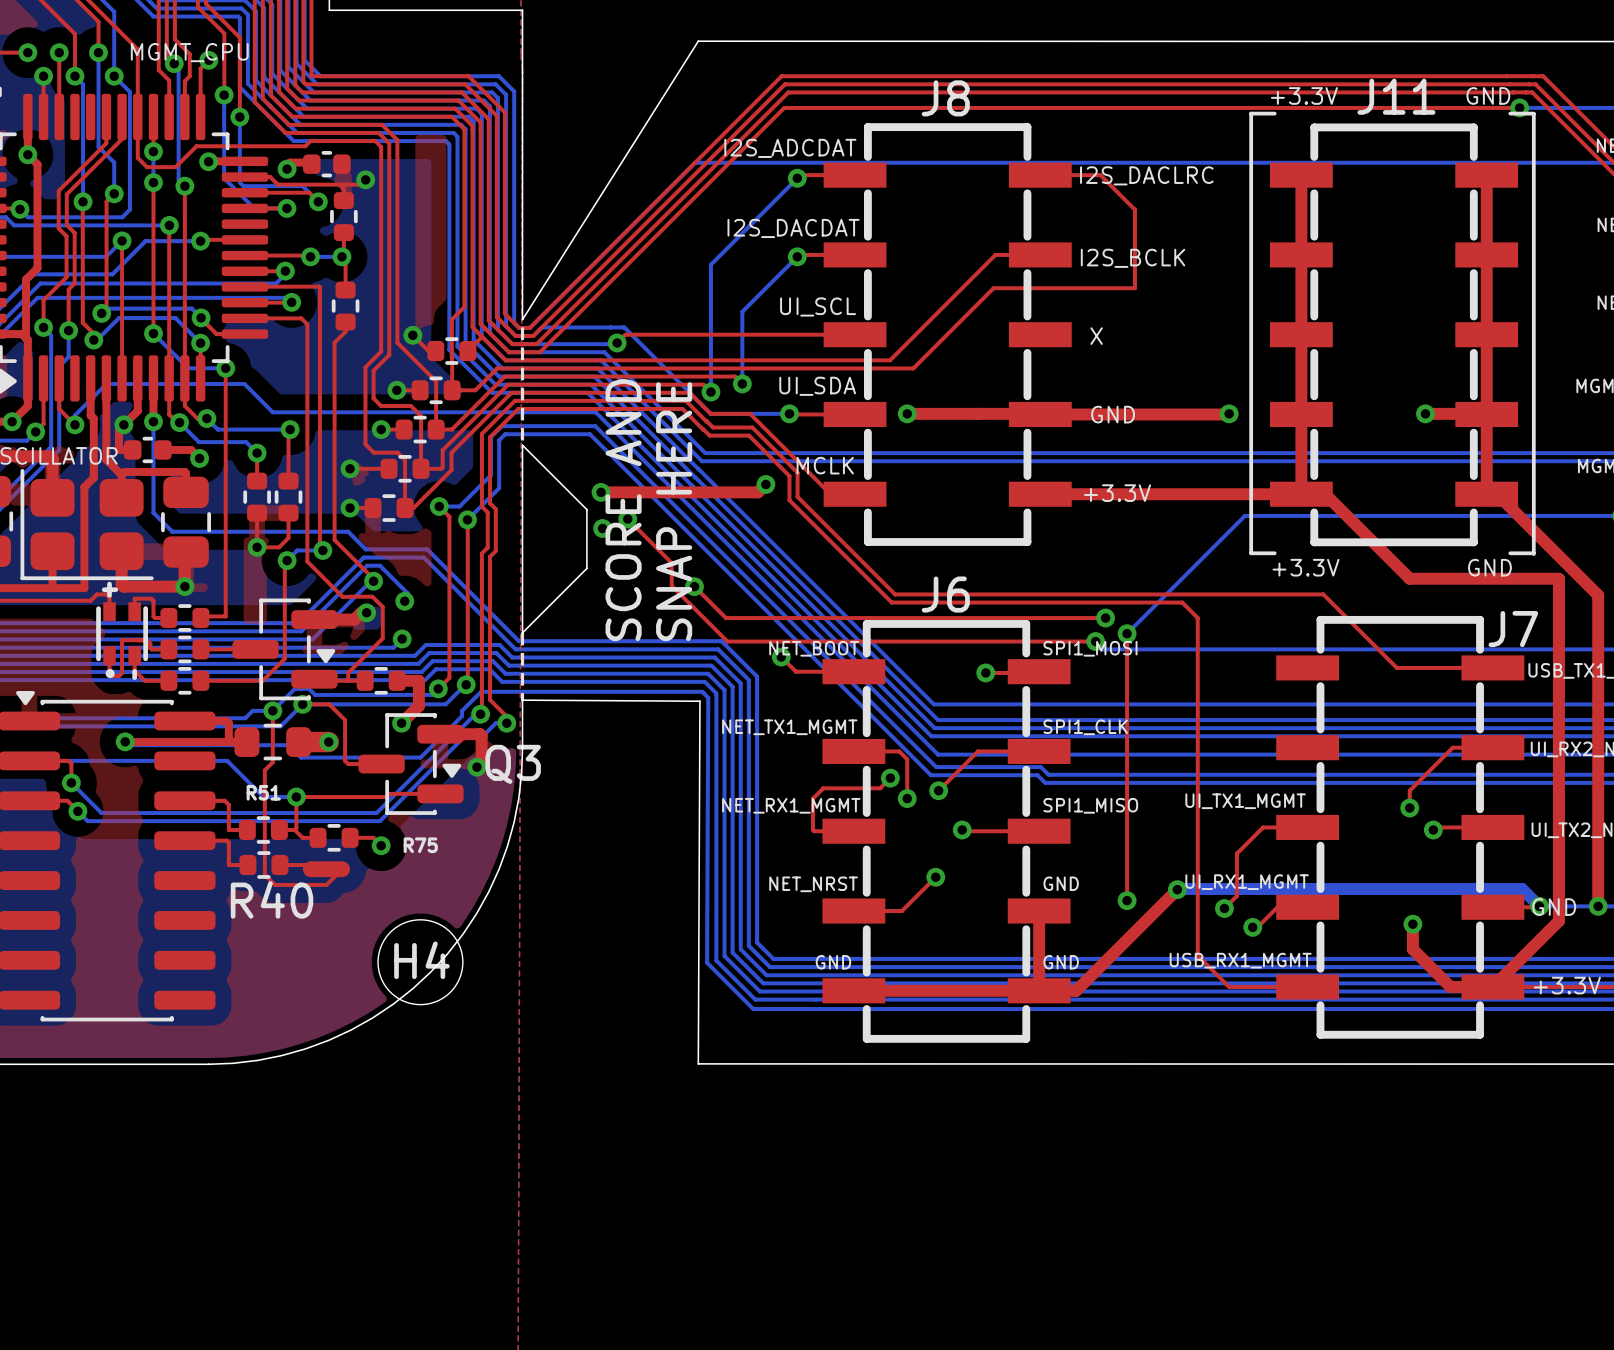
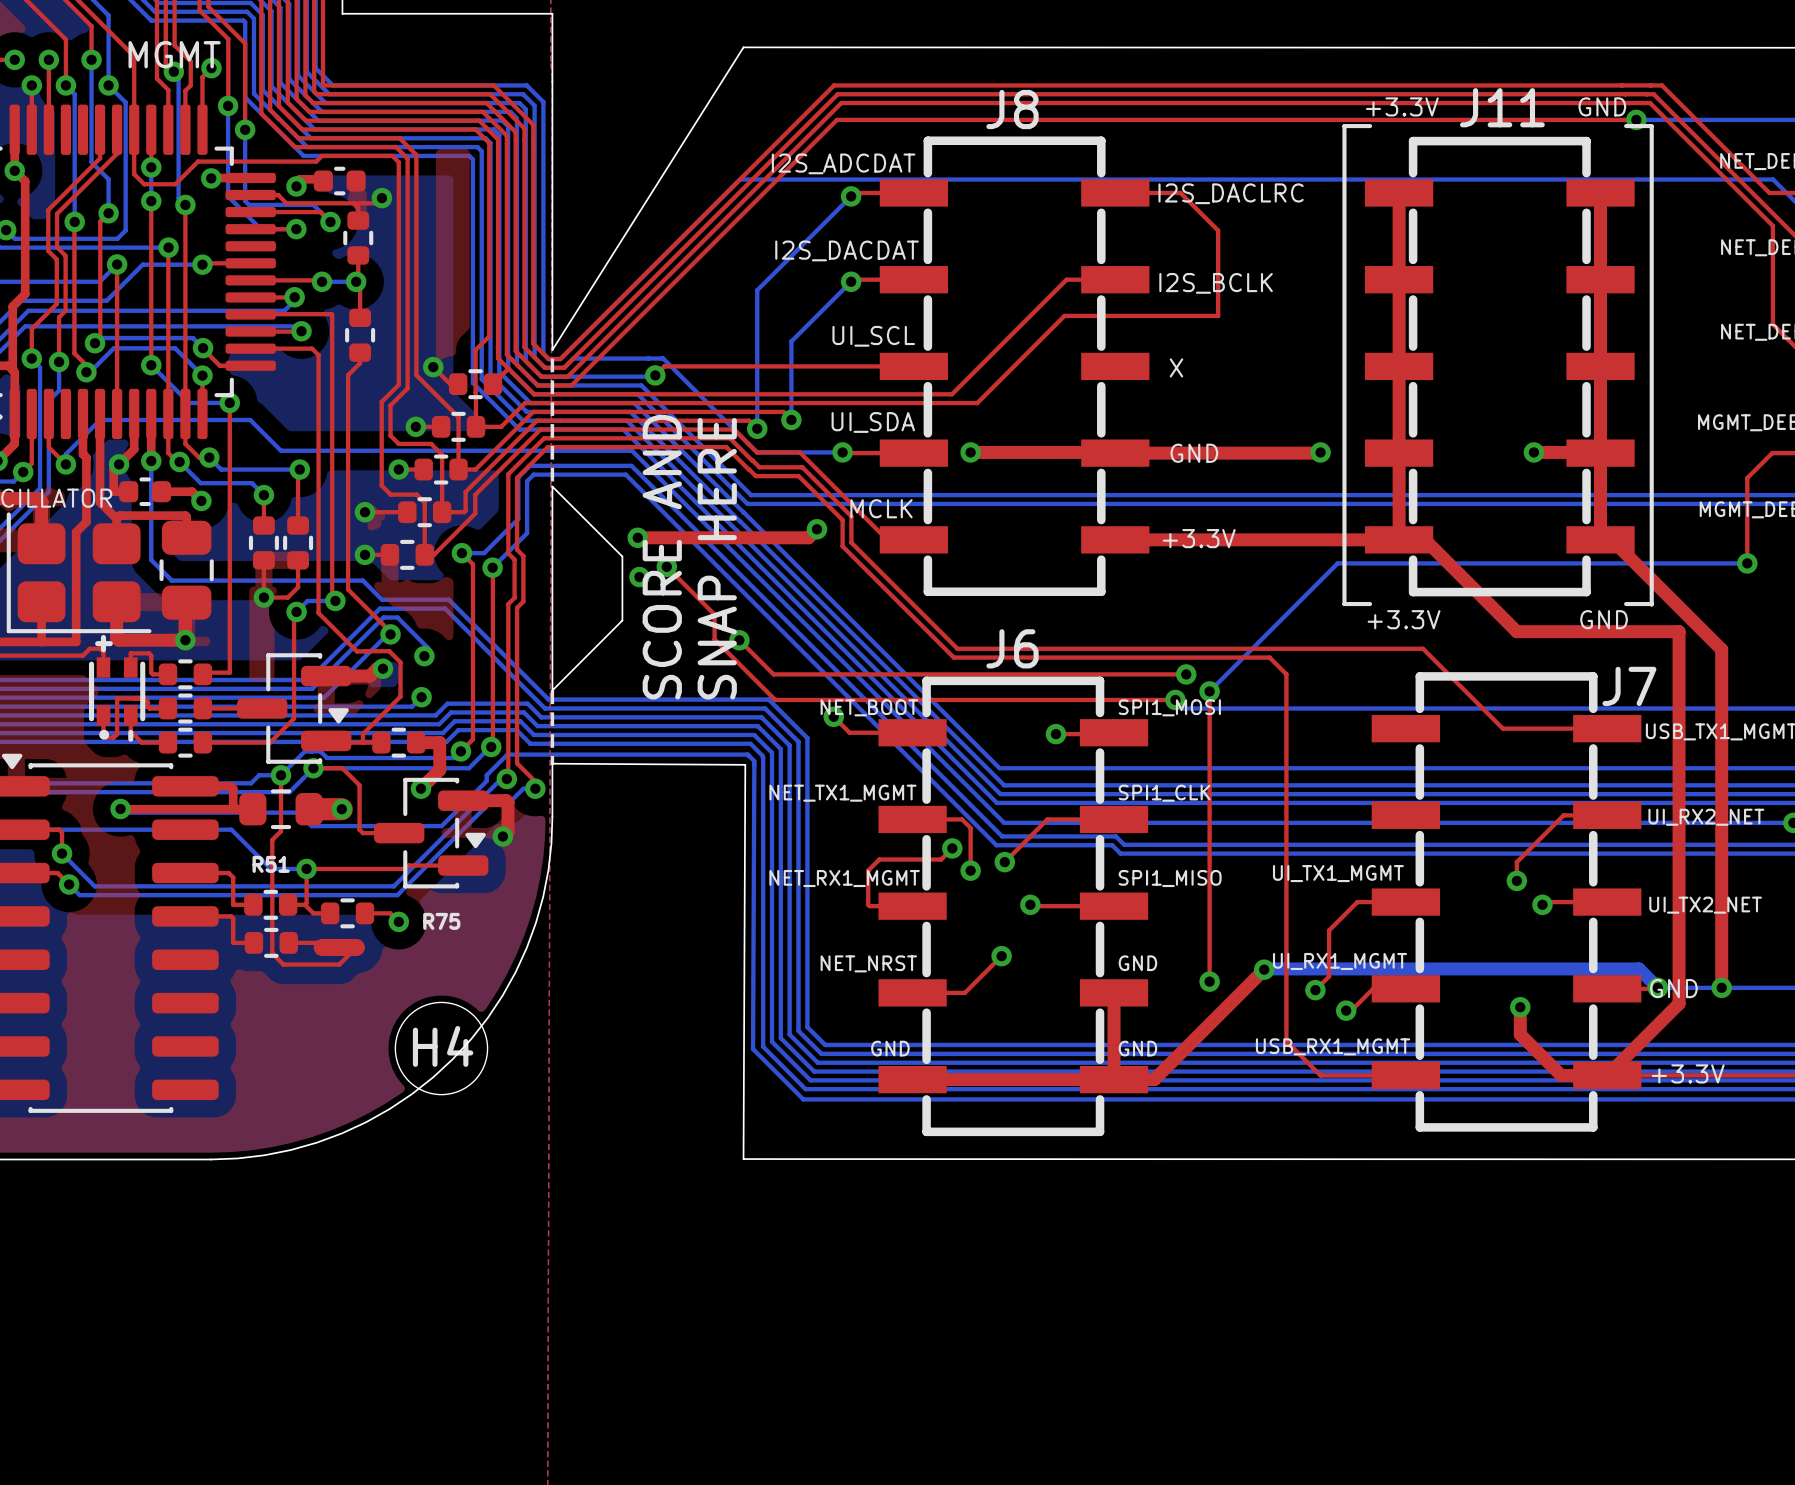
text: MGMT_CPU (189, 52) -> MGMT (174, 54)
Q3 name: Q3 (513, 764) -> none
R40 name: R40 (272, 899) -> none

